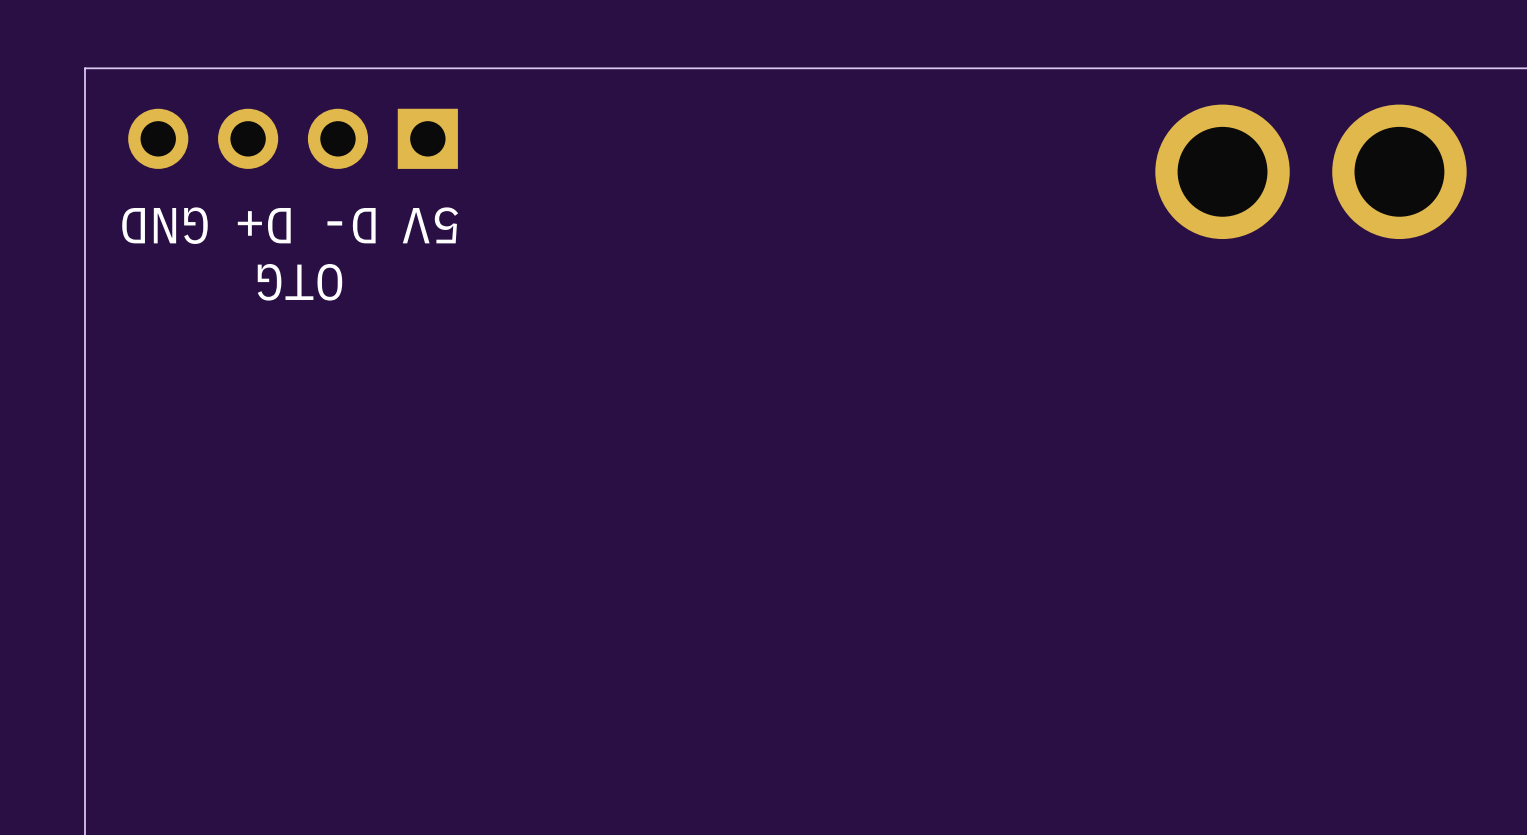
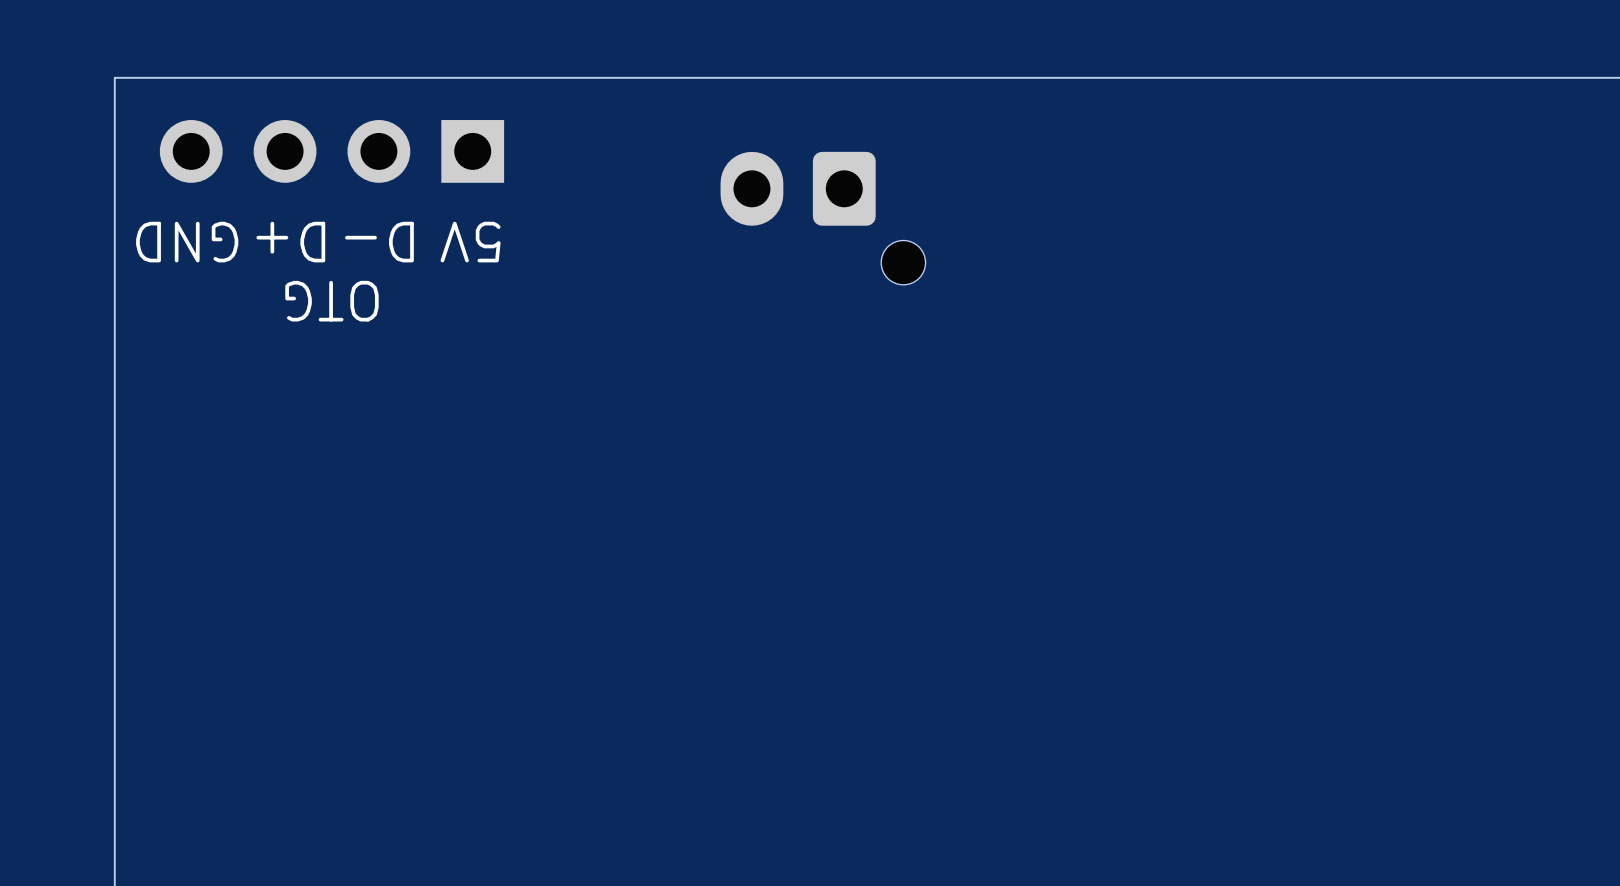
part: (1310, 171) -> none
part: none -> (823, 218)

